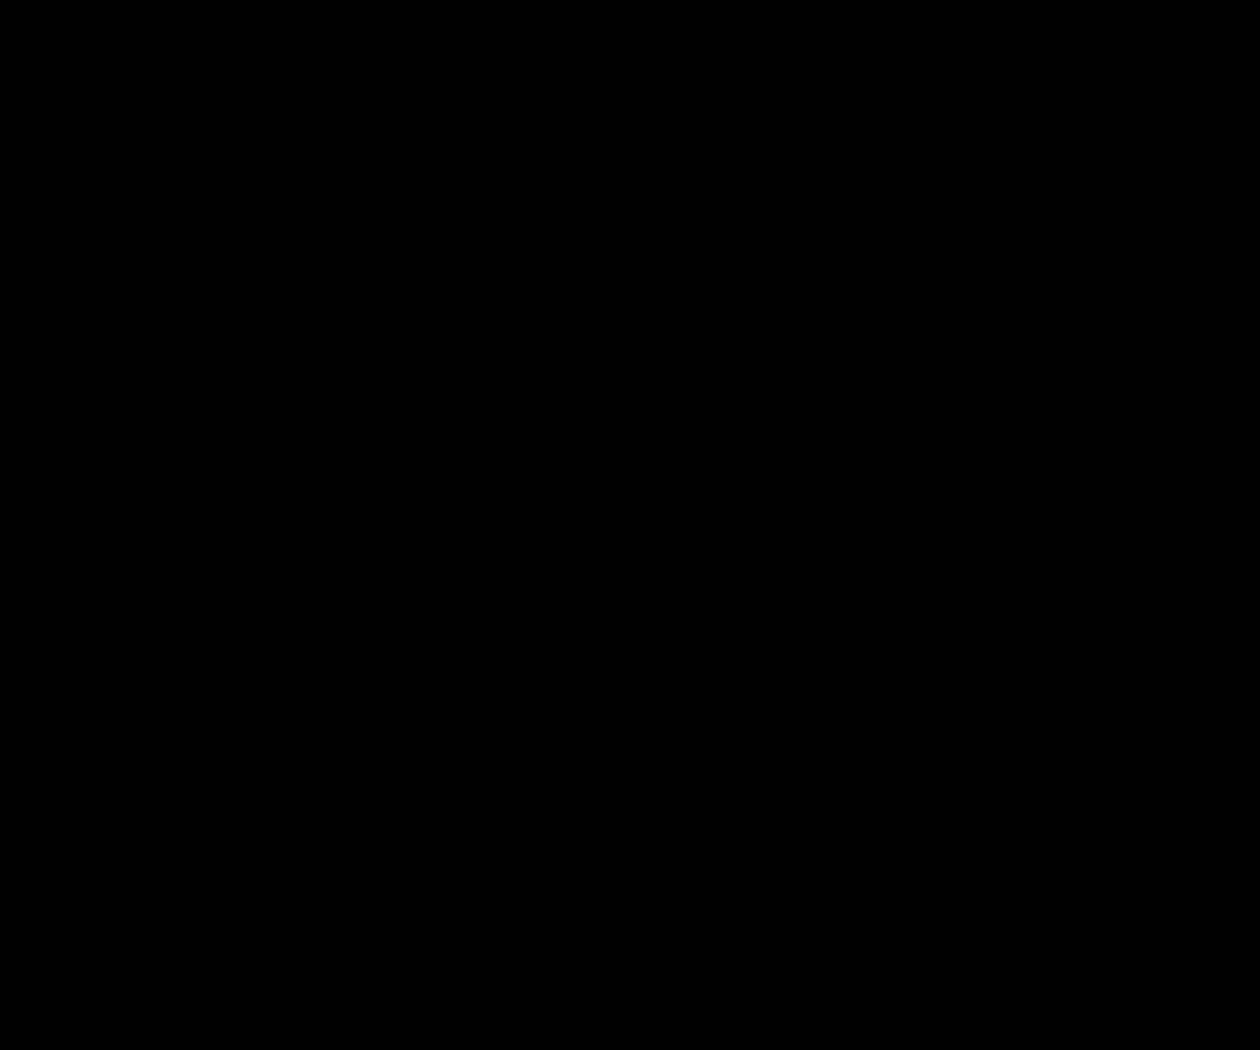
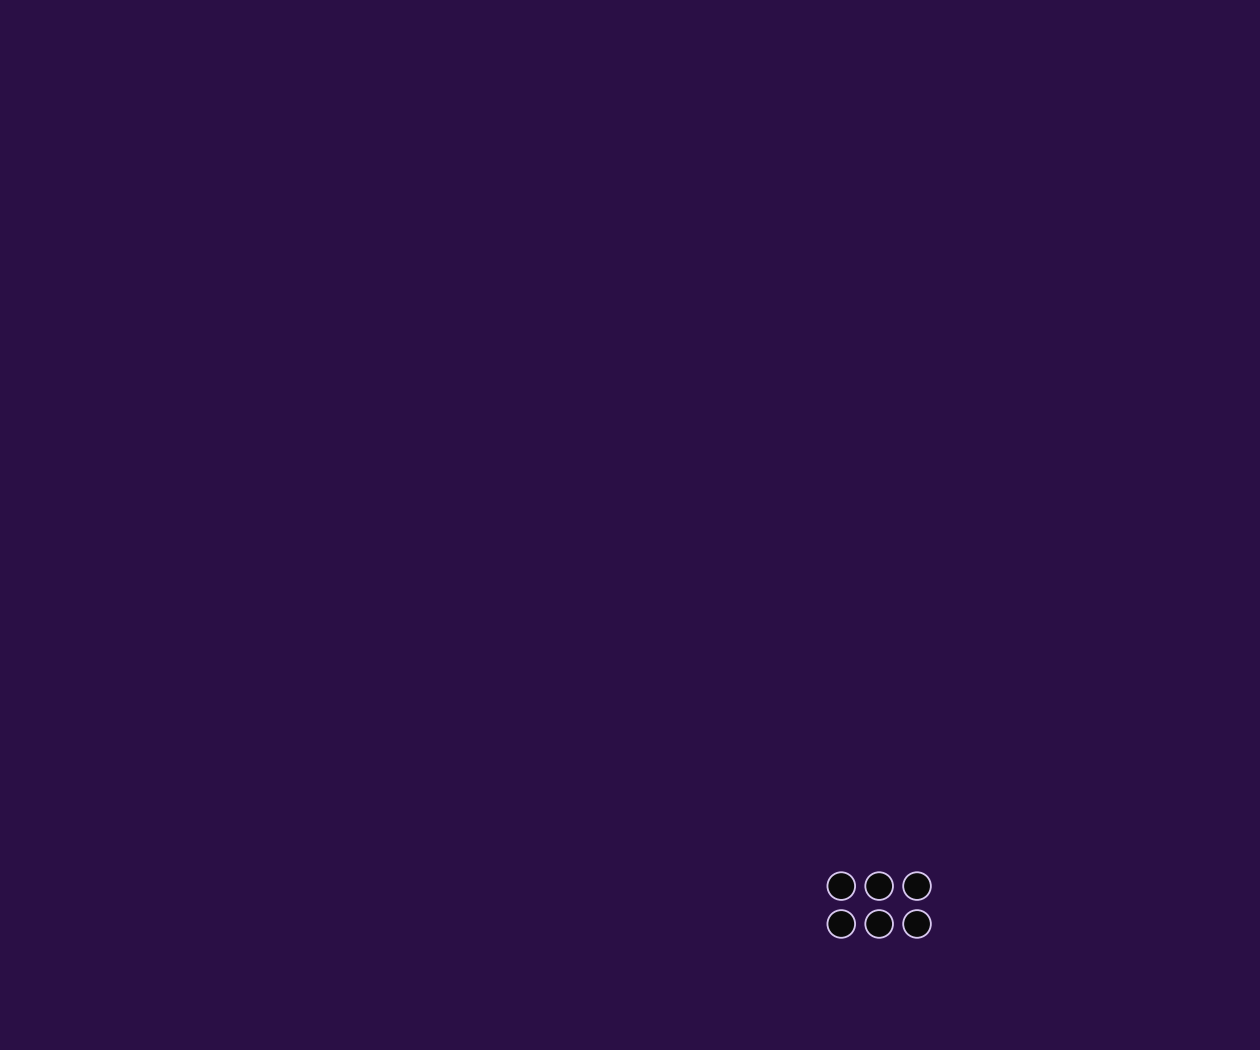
part: none -> (841, 886)
part: none -> (879, 886)
part: none -> (917, 886)
part: none -> (841, 923)
part: none -> (879, 923)
part: none -> (917, 923)

